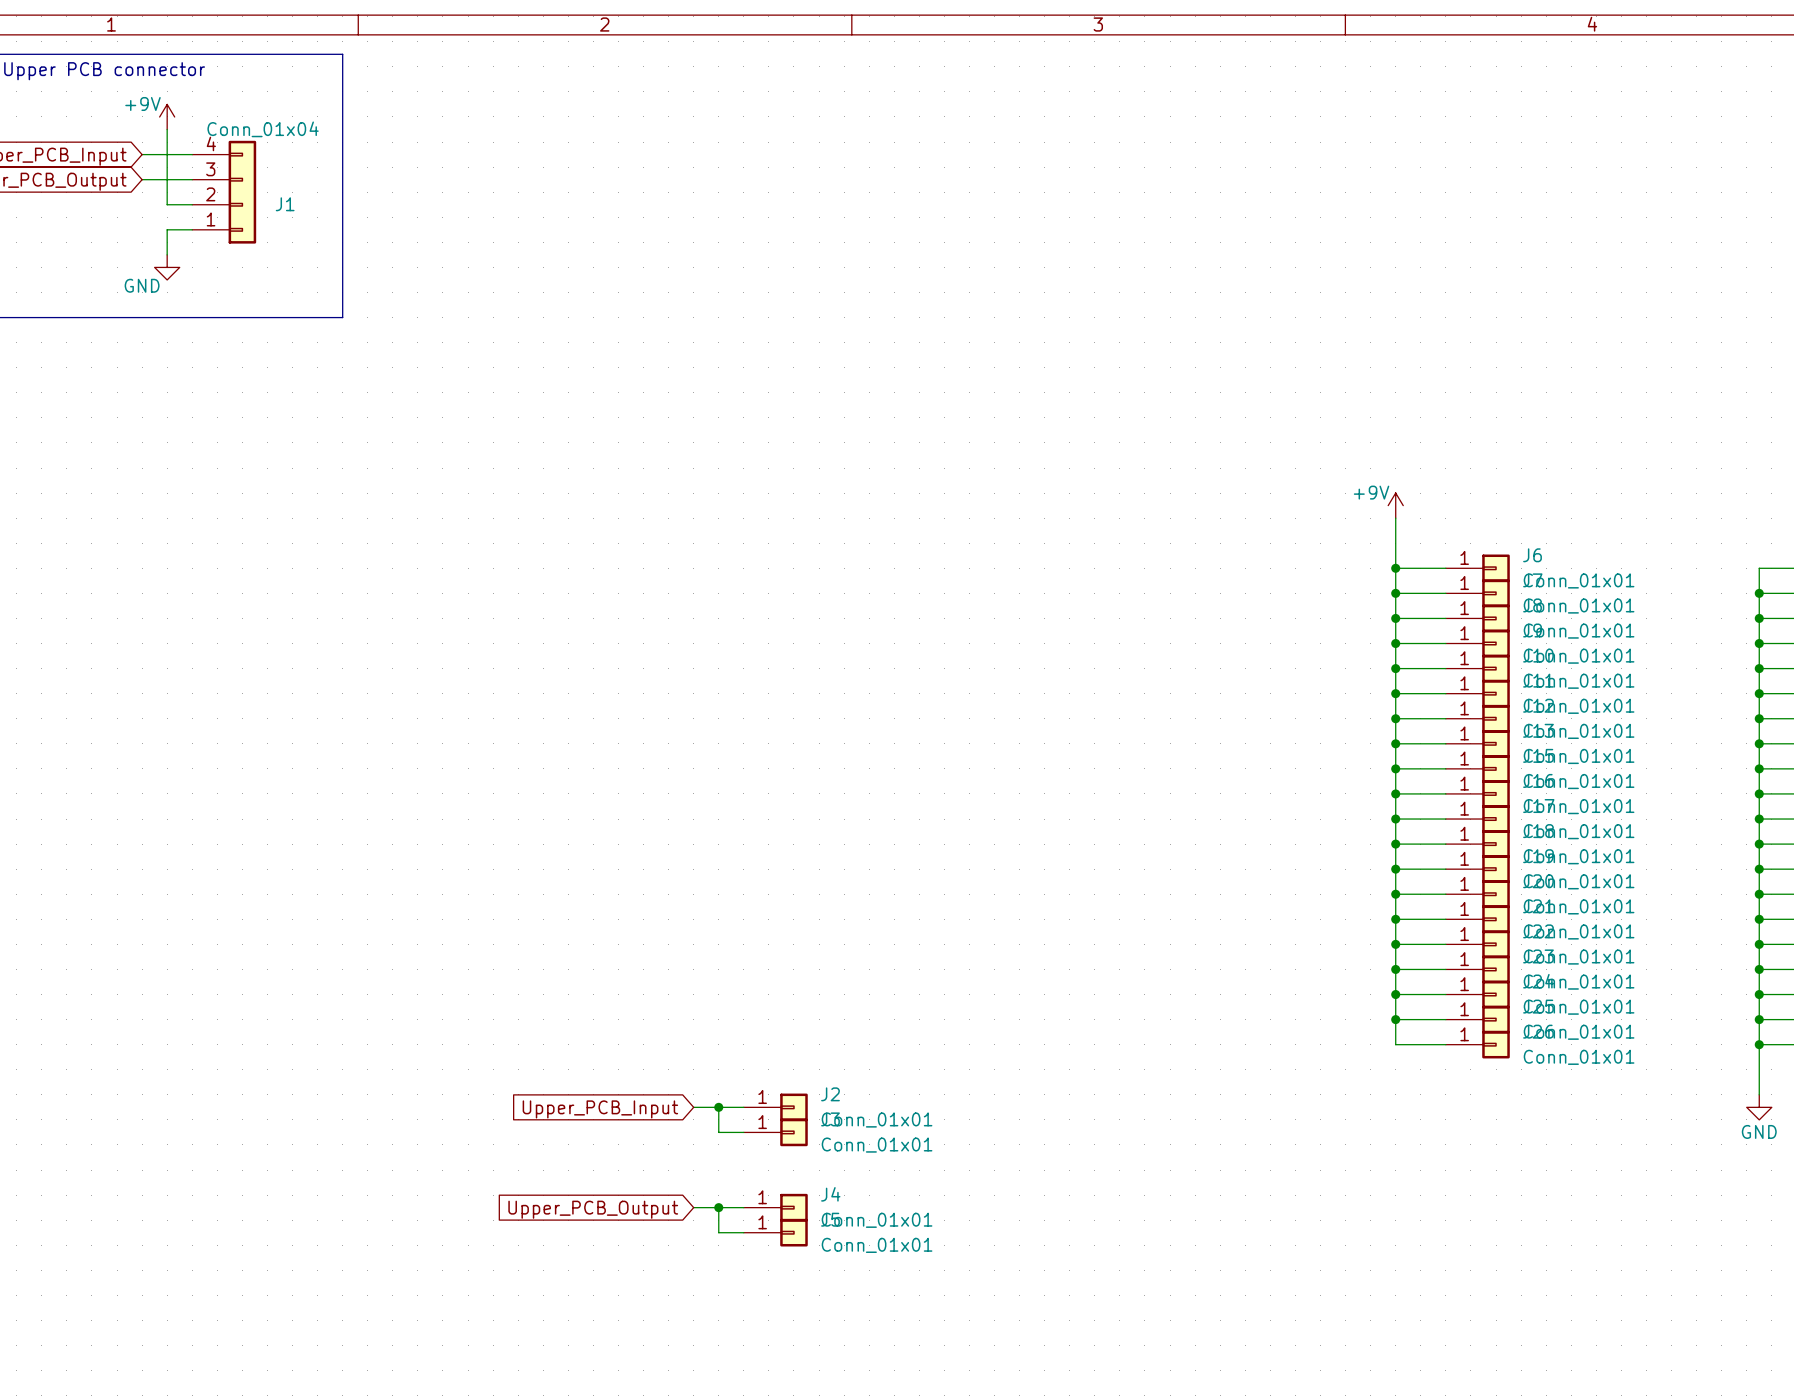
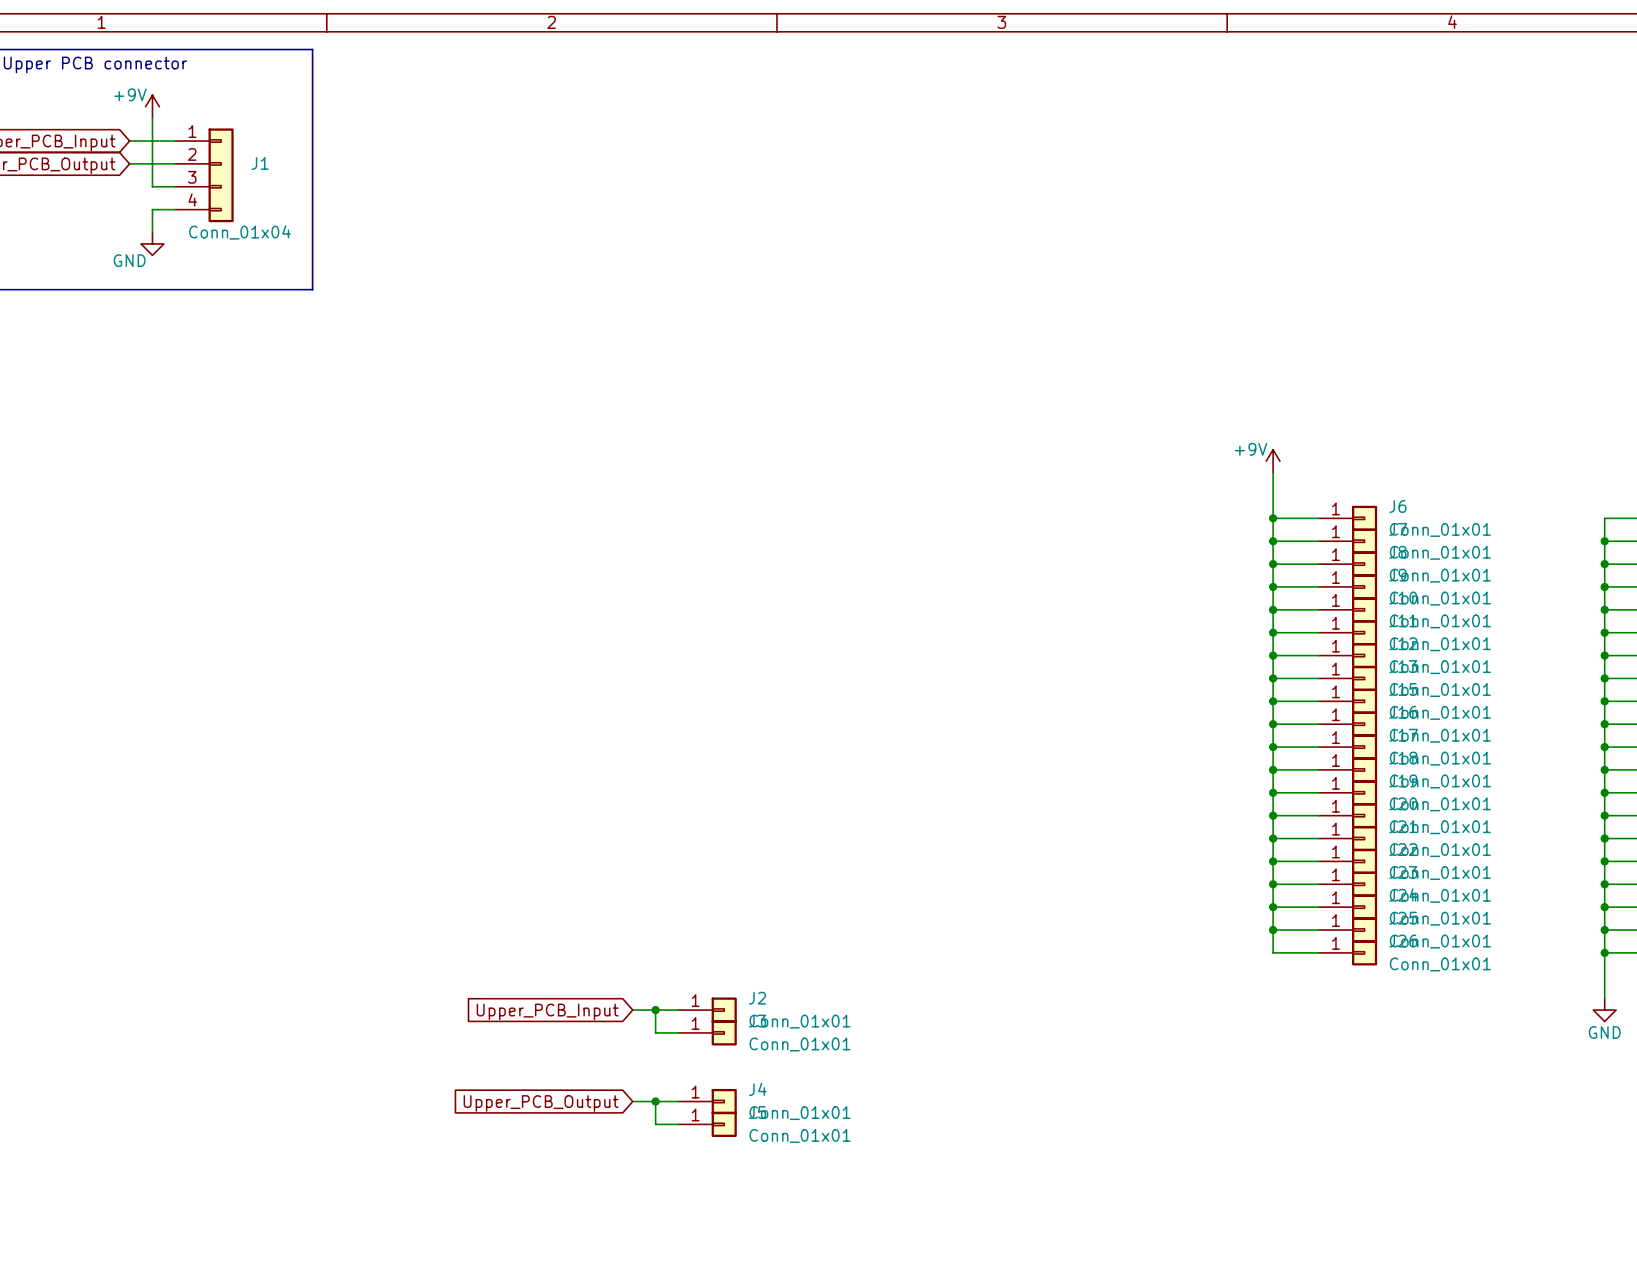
J1 flip: as is (242, 192) -> up-down (221, 175)

